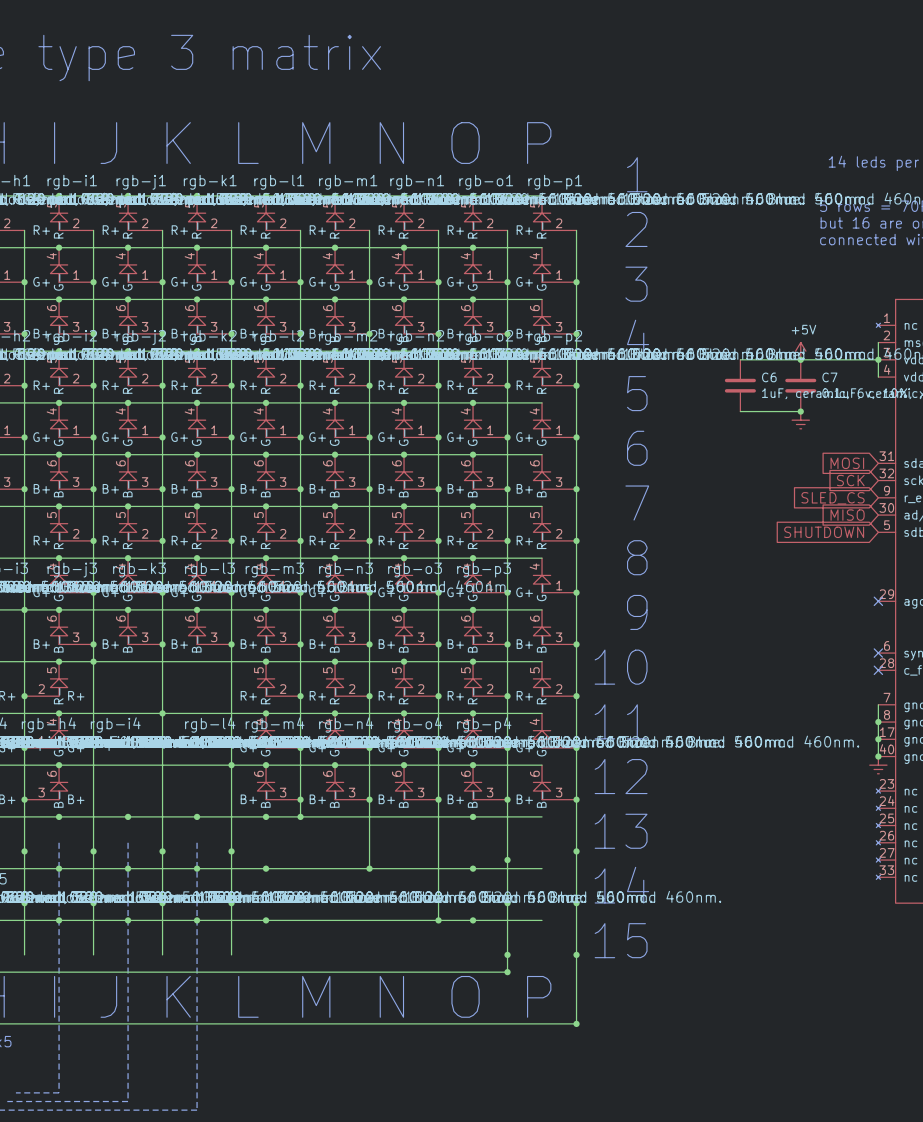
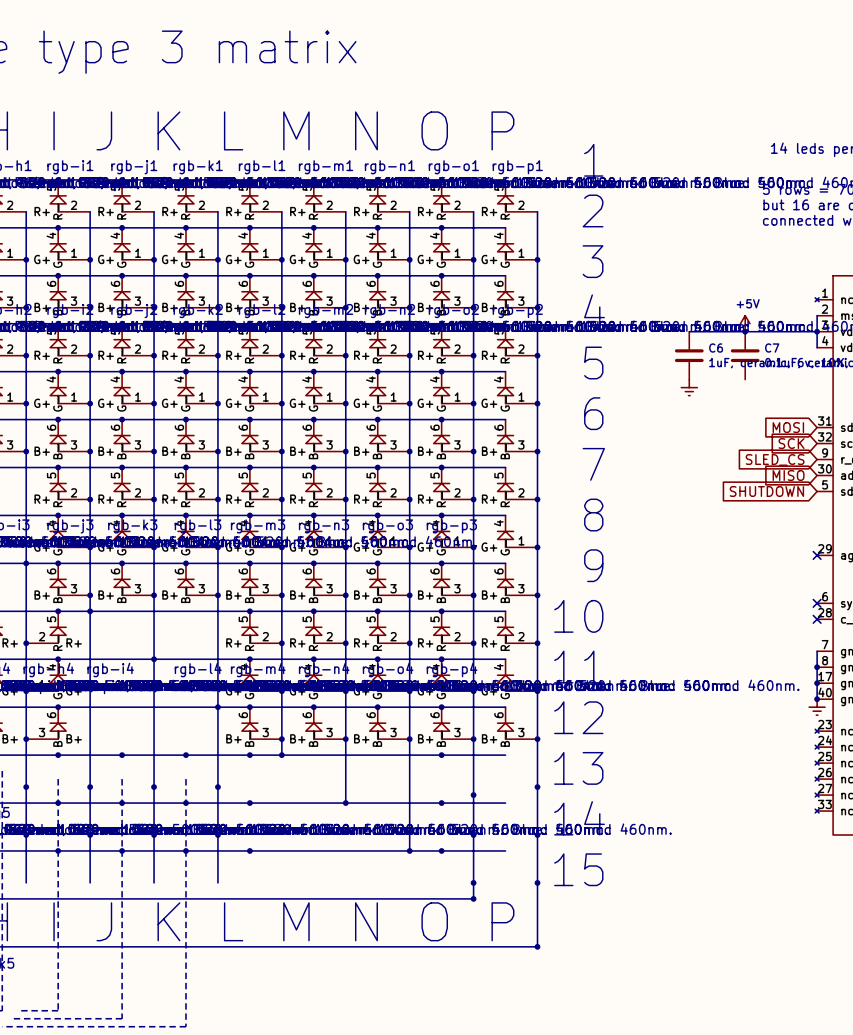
wire: (740, 411) (800, 411) -> none
junction: (800, 411) -> none
power symbol position: (800, 420) -> (689, 387)

